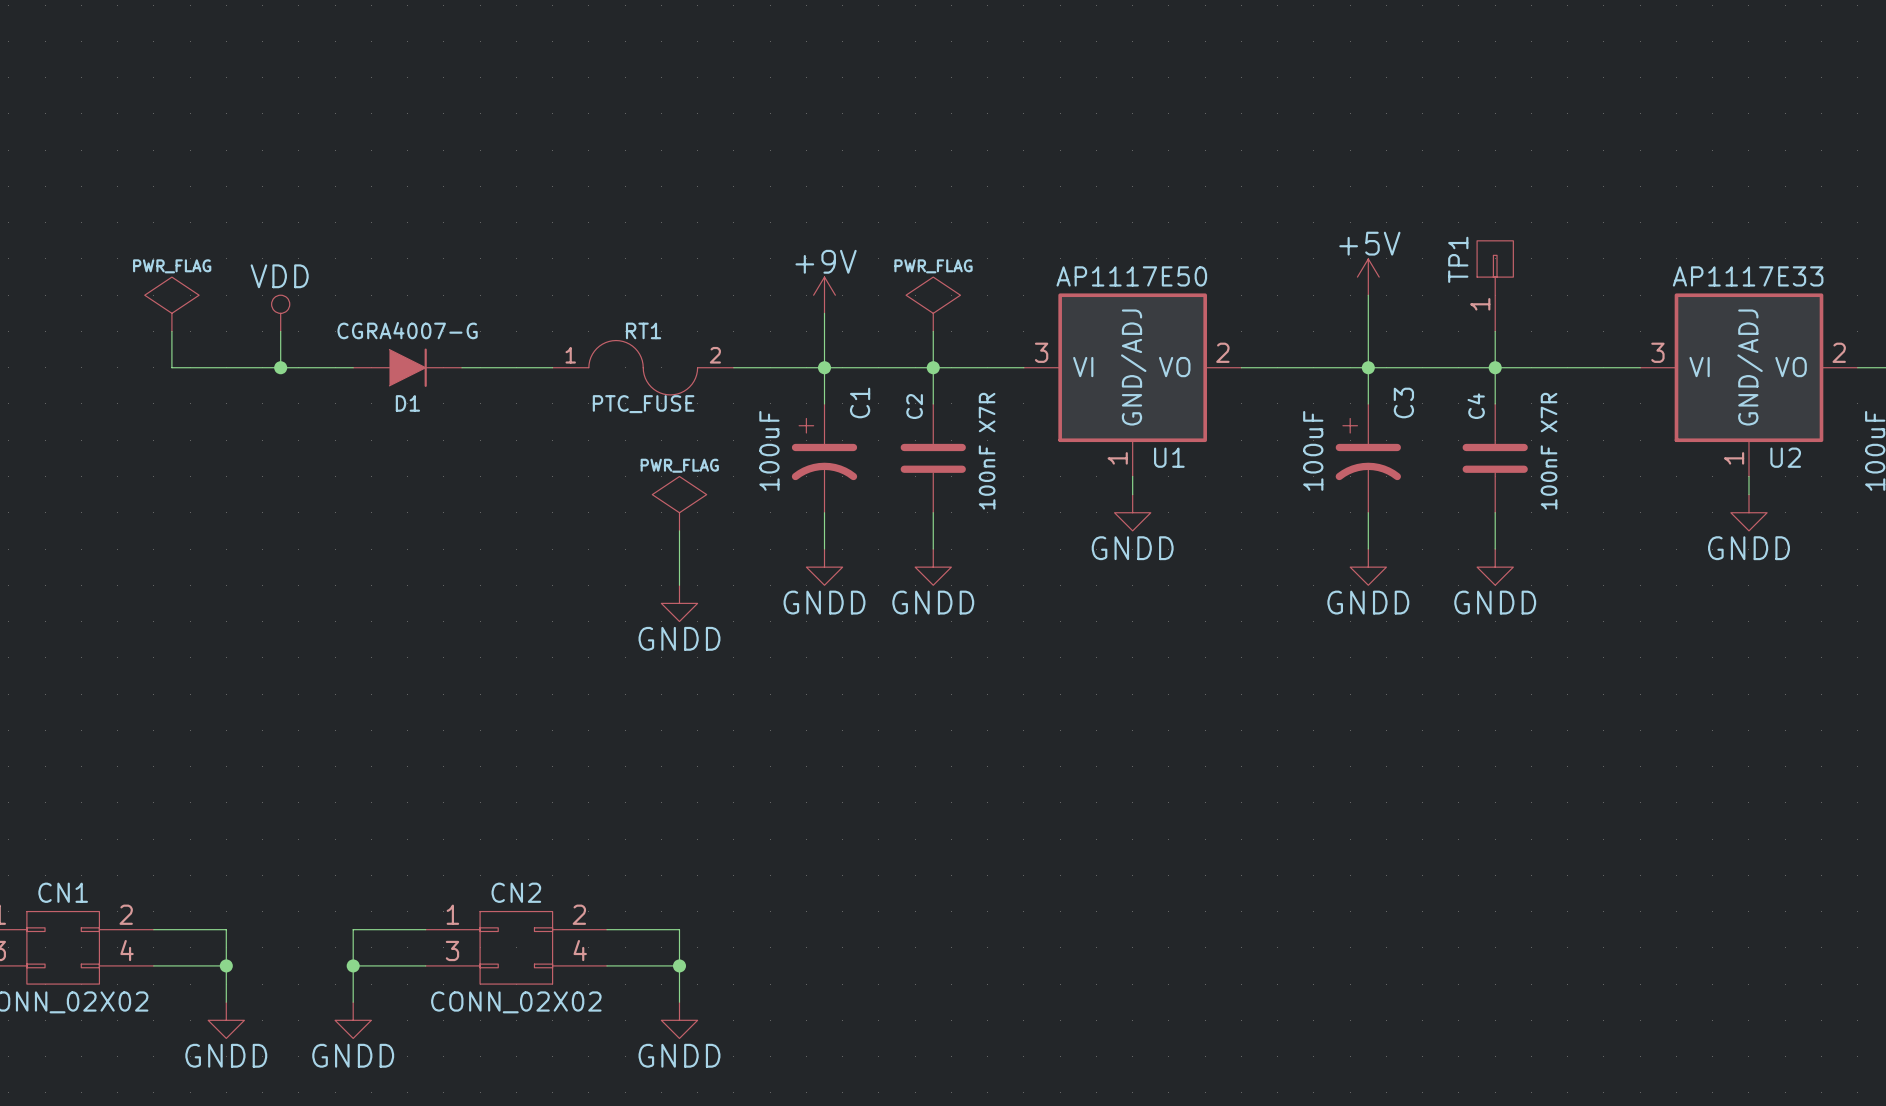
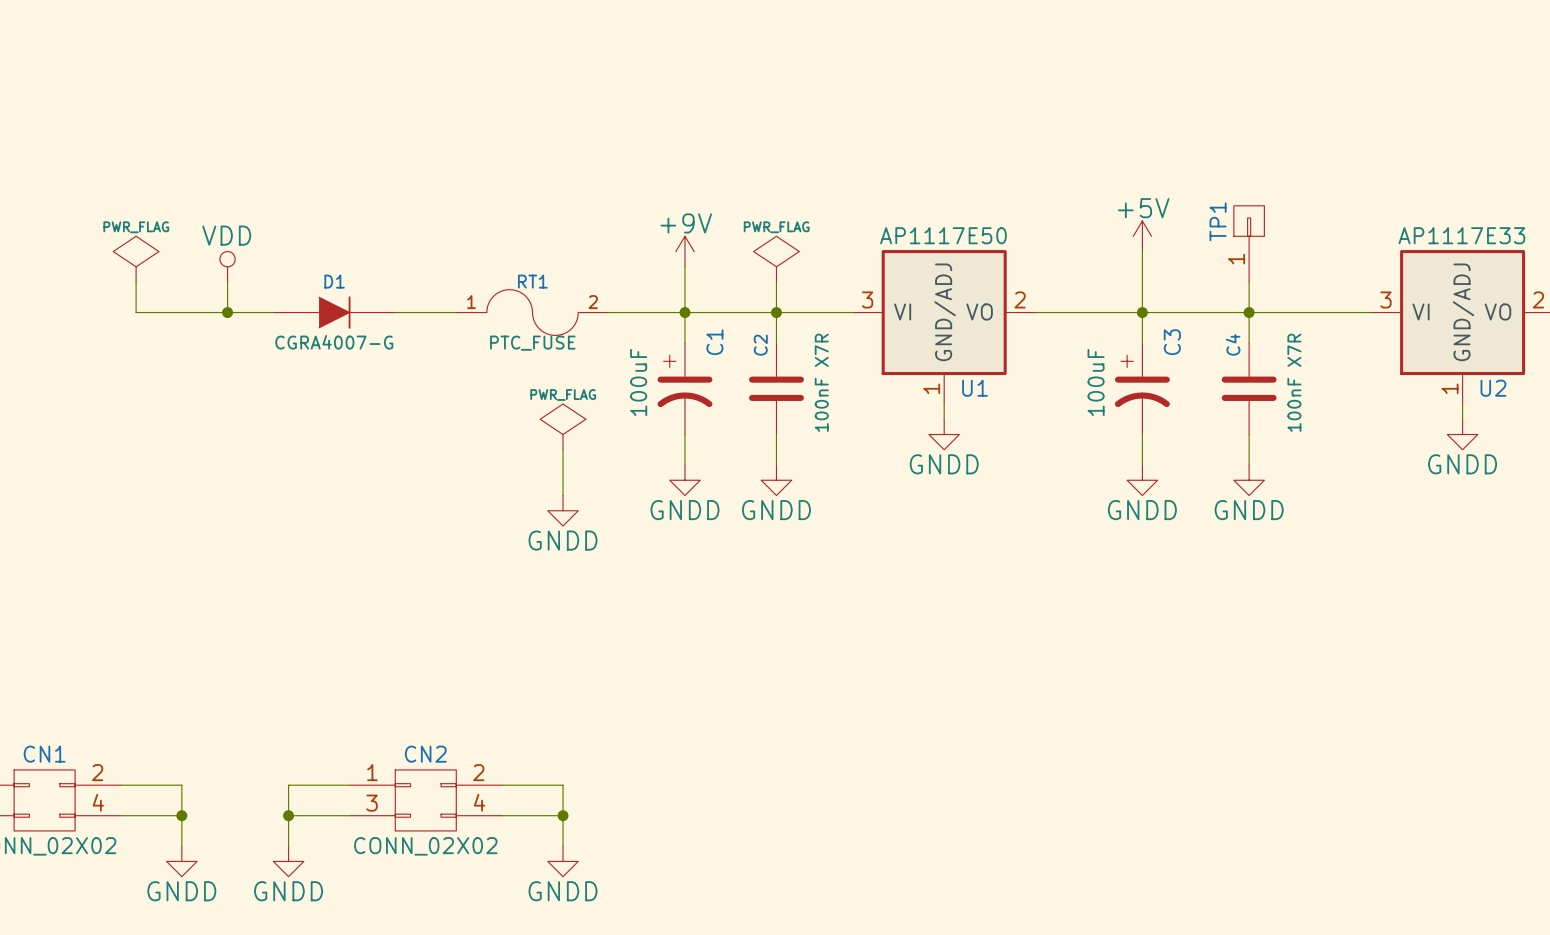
D1 value position: CGRA4007-G (407, 330) -> CGRA4007-G (334, 342)
D1 symbol: [353, 348, 462, 387] -> [273, 296, 396, 329]
D1 name position: D1 (407, 403) -> D1 (334, 281)

